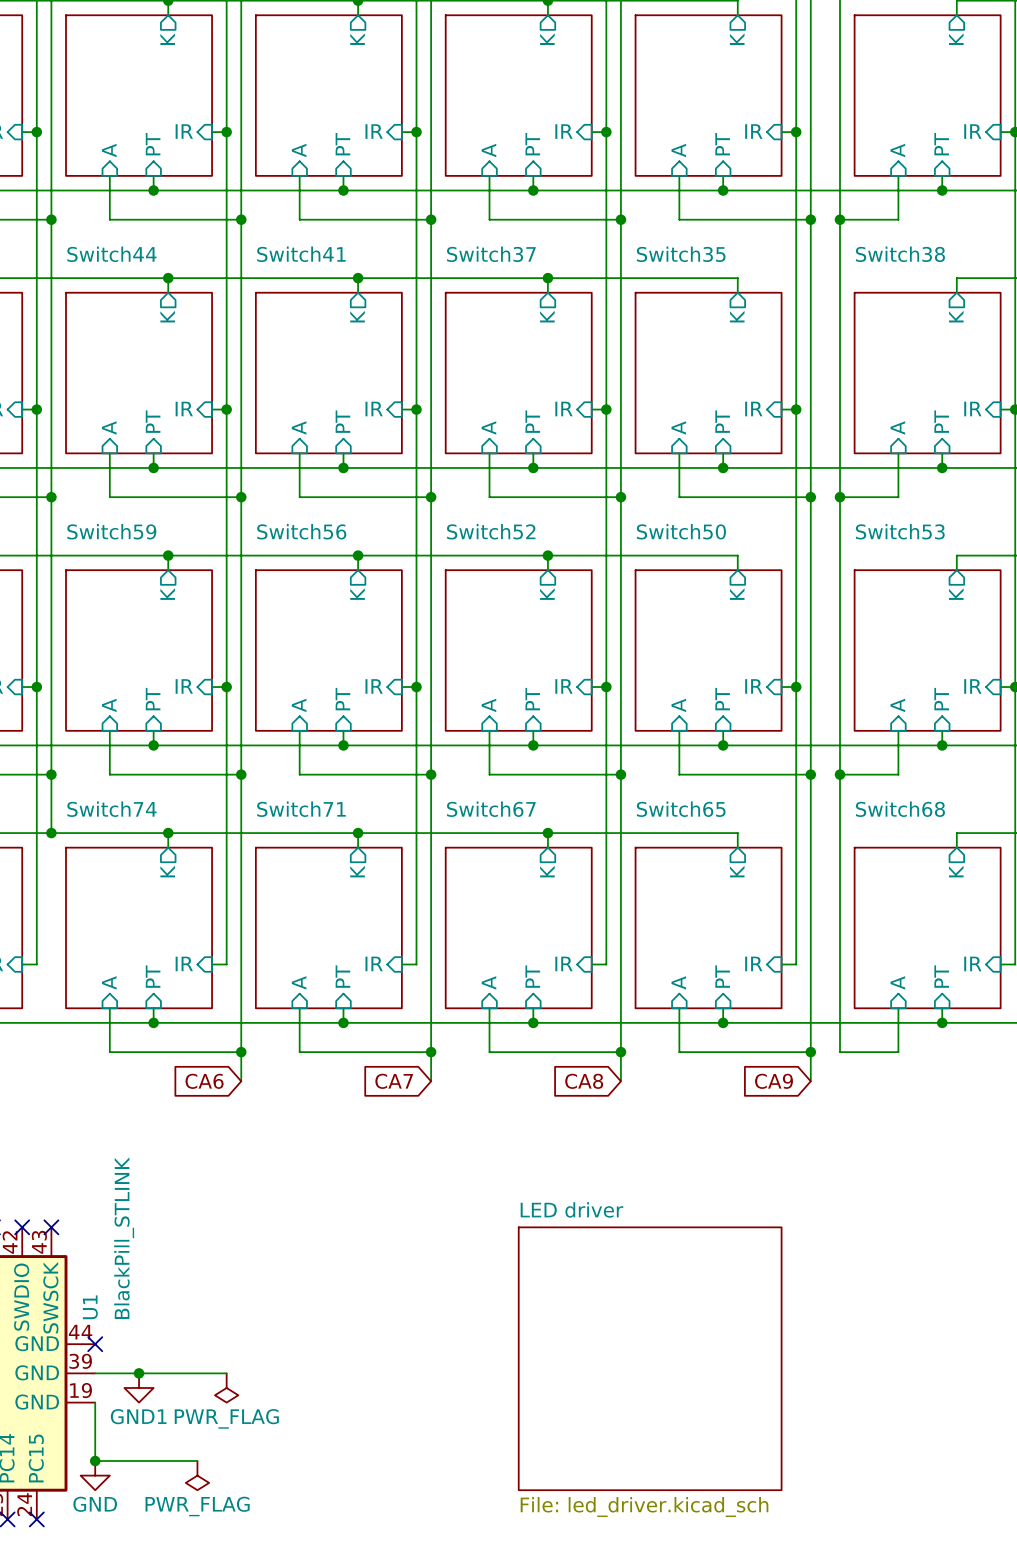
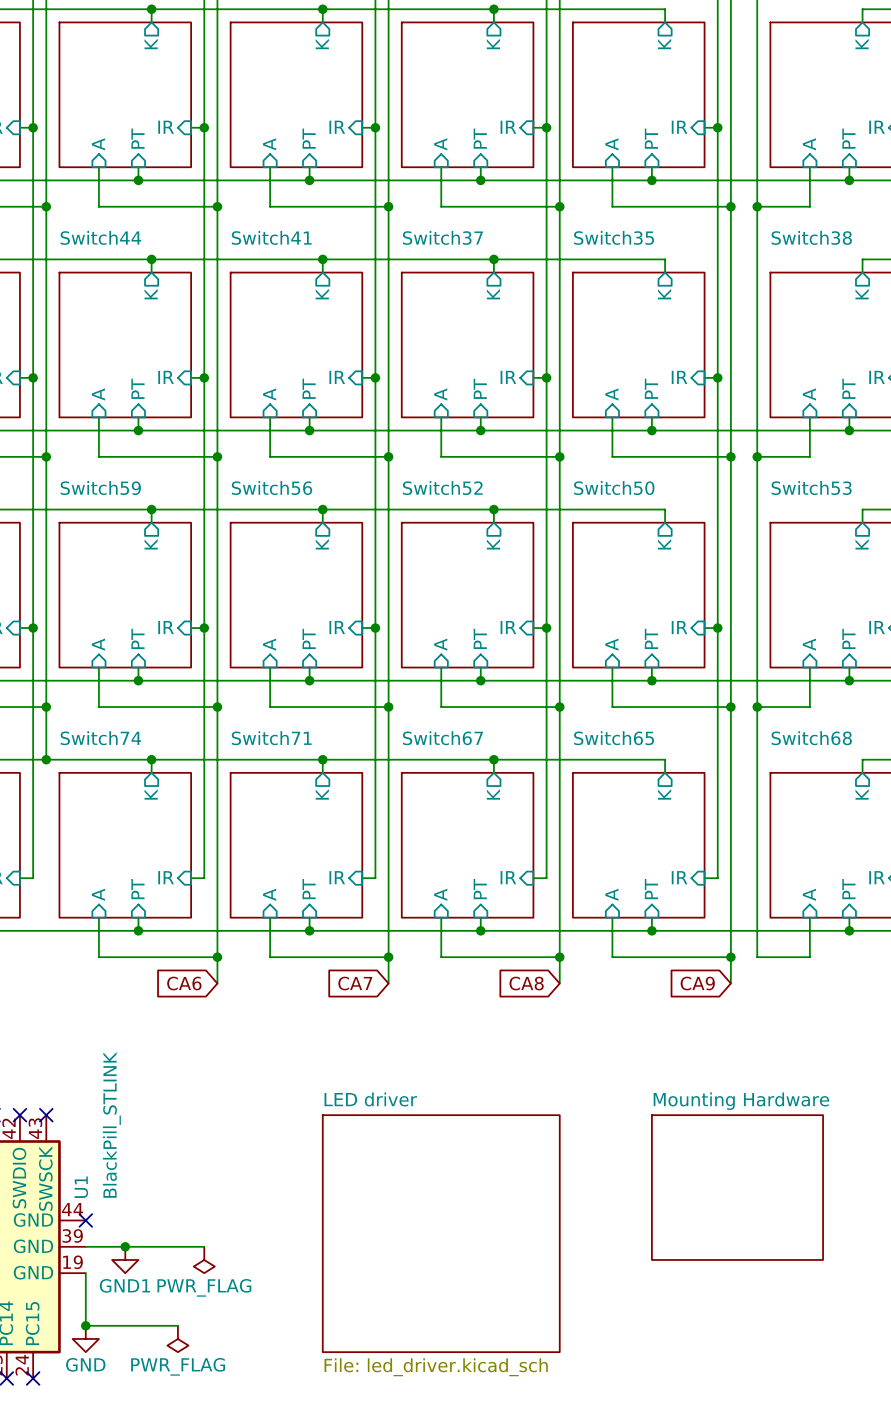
sheet Mounting Hardware: none -> (737, 1187)
sheet LED driver position: (650, 1358) -> (441, 1233)

